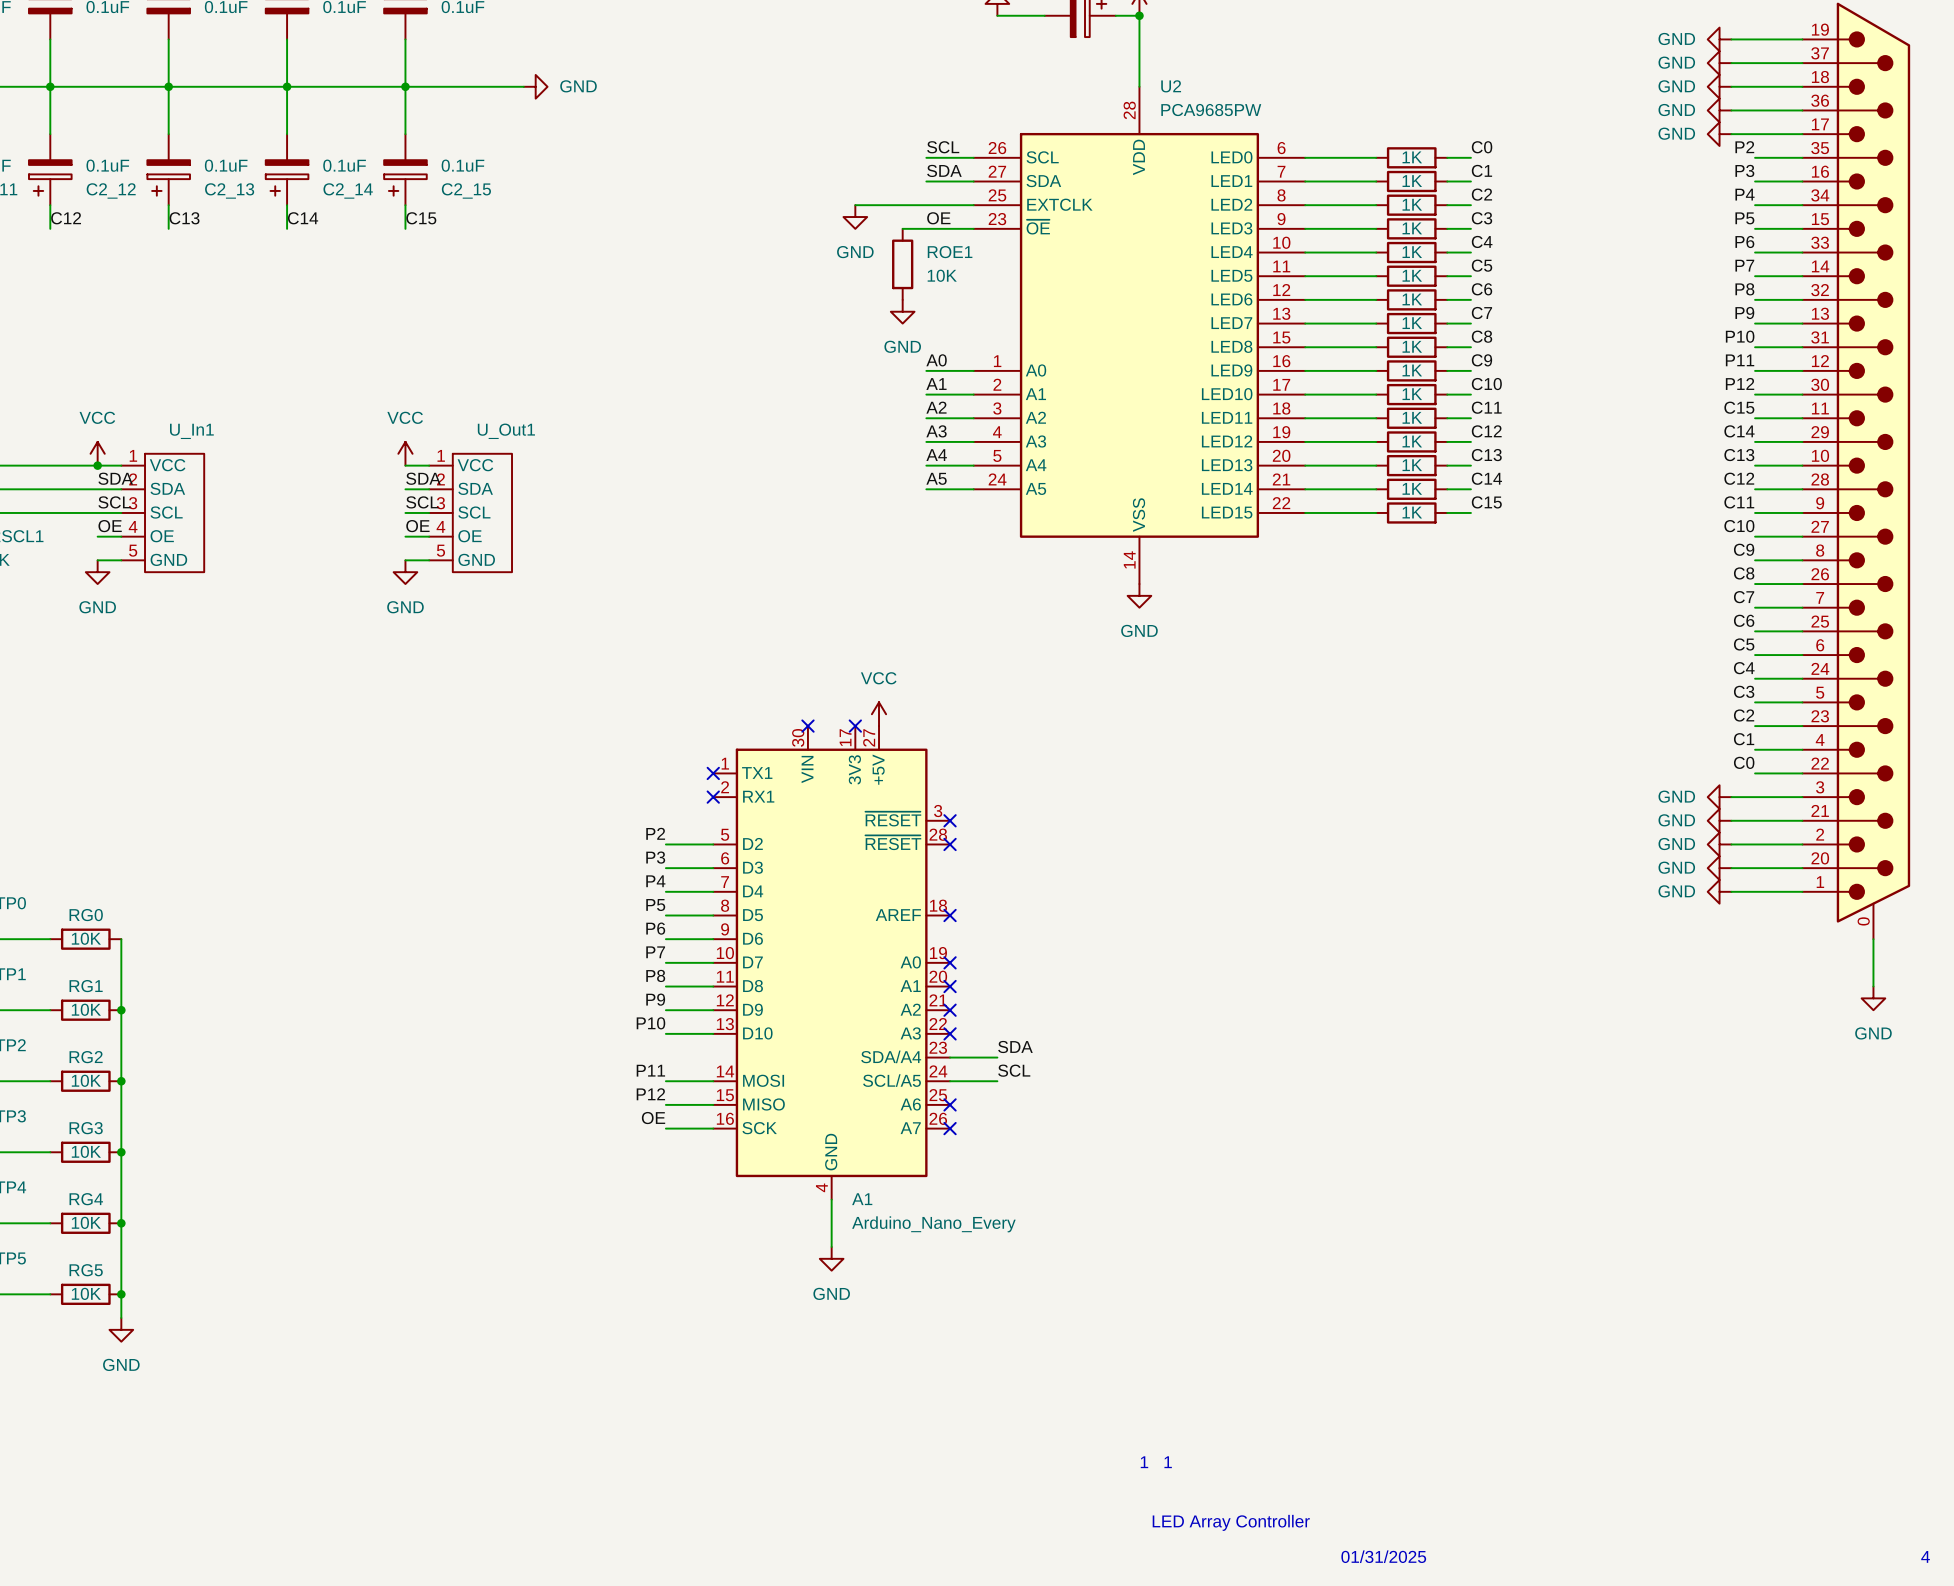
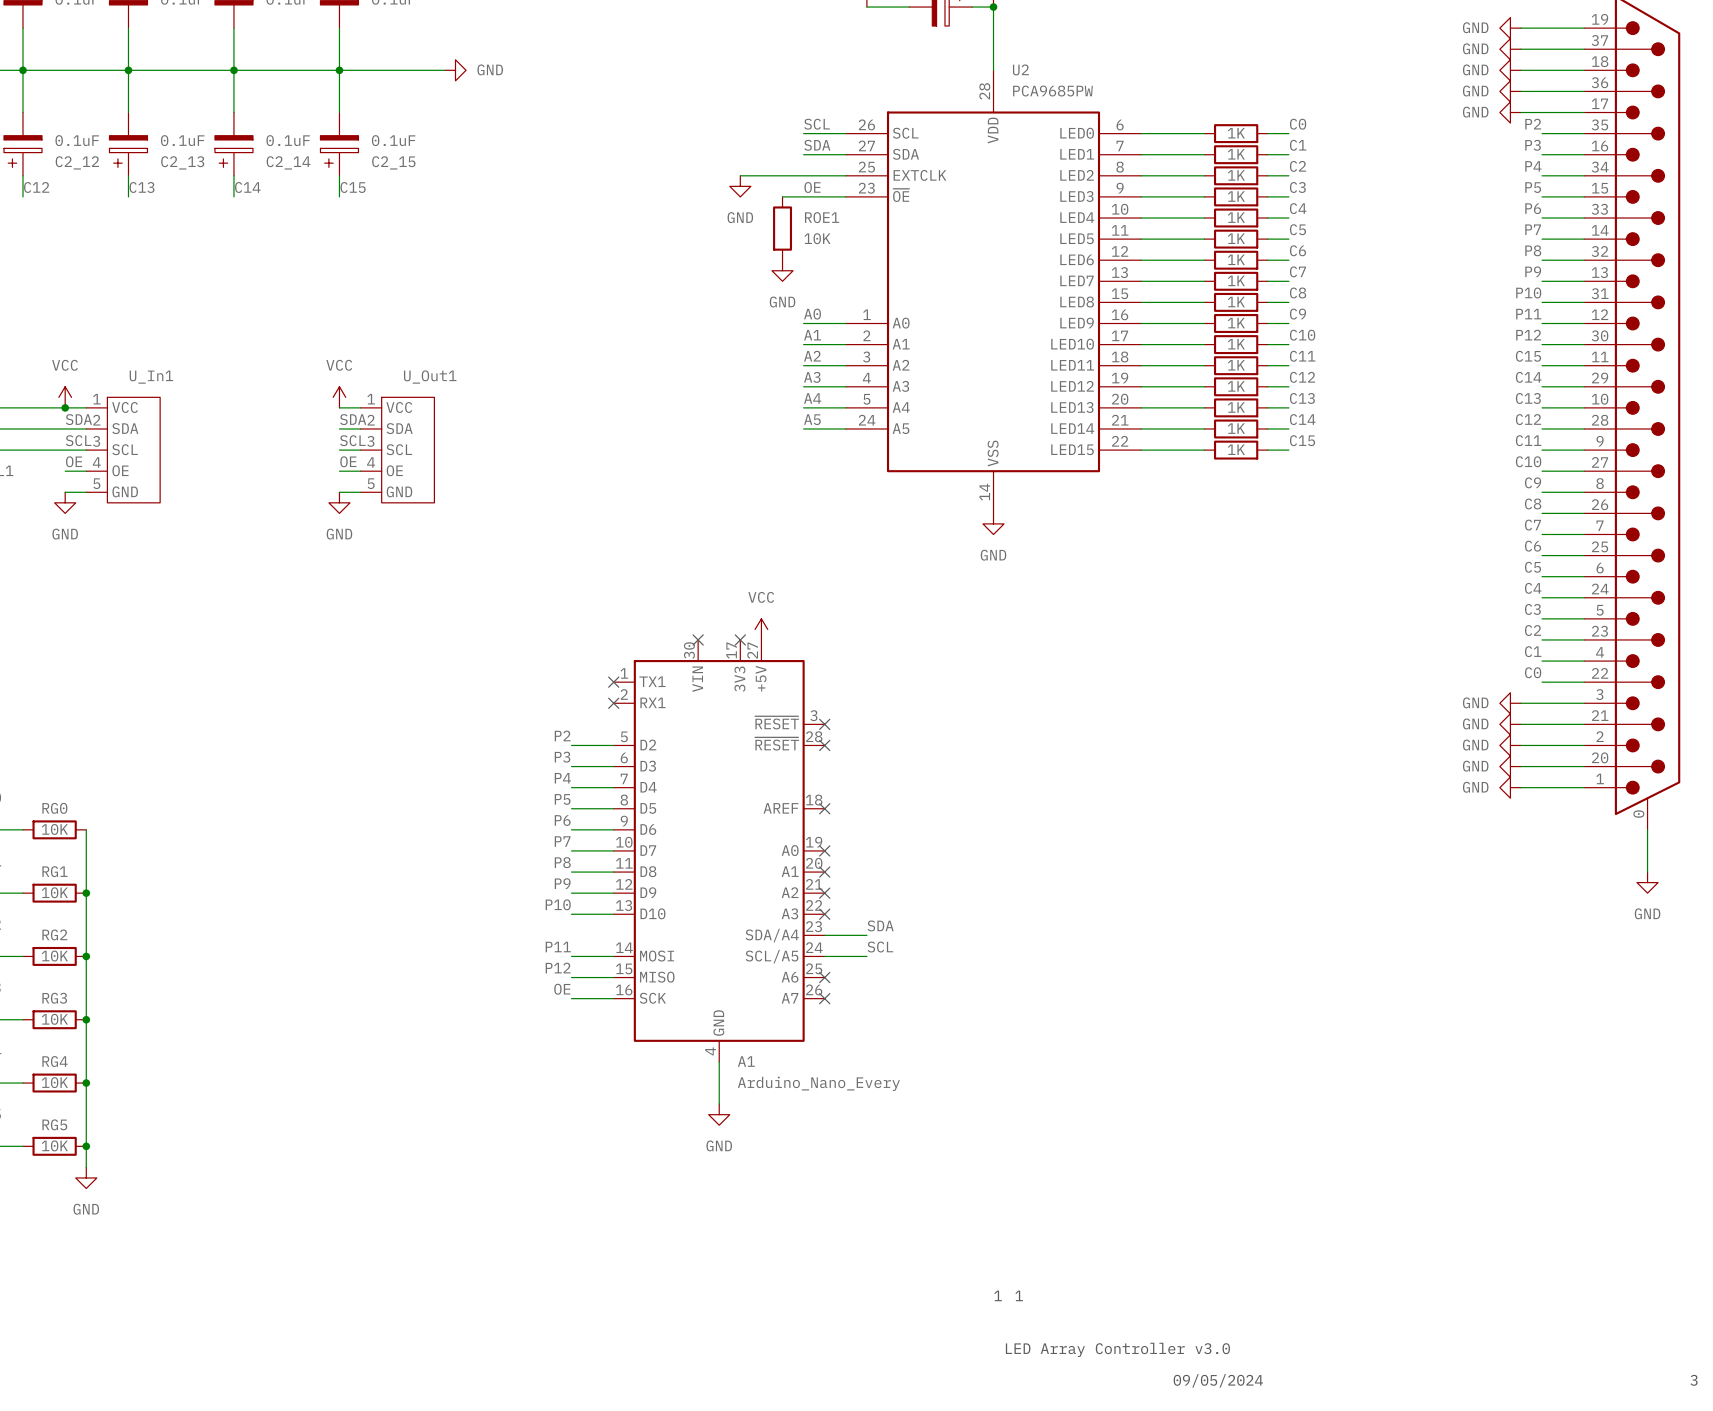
text: LED Array Controller (1231, 1522) -> LED Array Controller v3.0 (1117, 1349)
text: 01/31/2025 (1383, 1556) -> 09/05/2024 (1218, 1380)
text: 4 (1925, 1556) -> 3 (1694, 1380)

